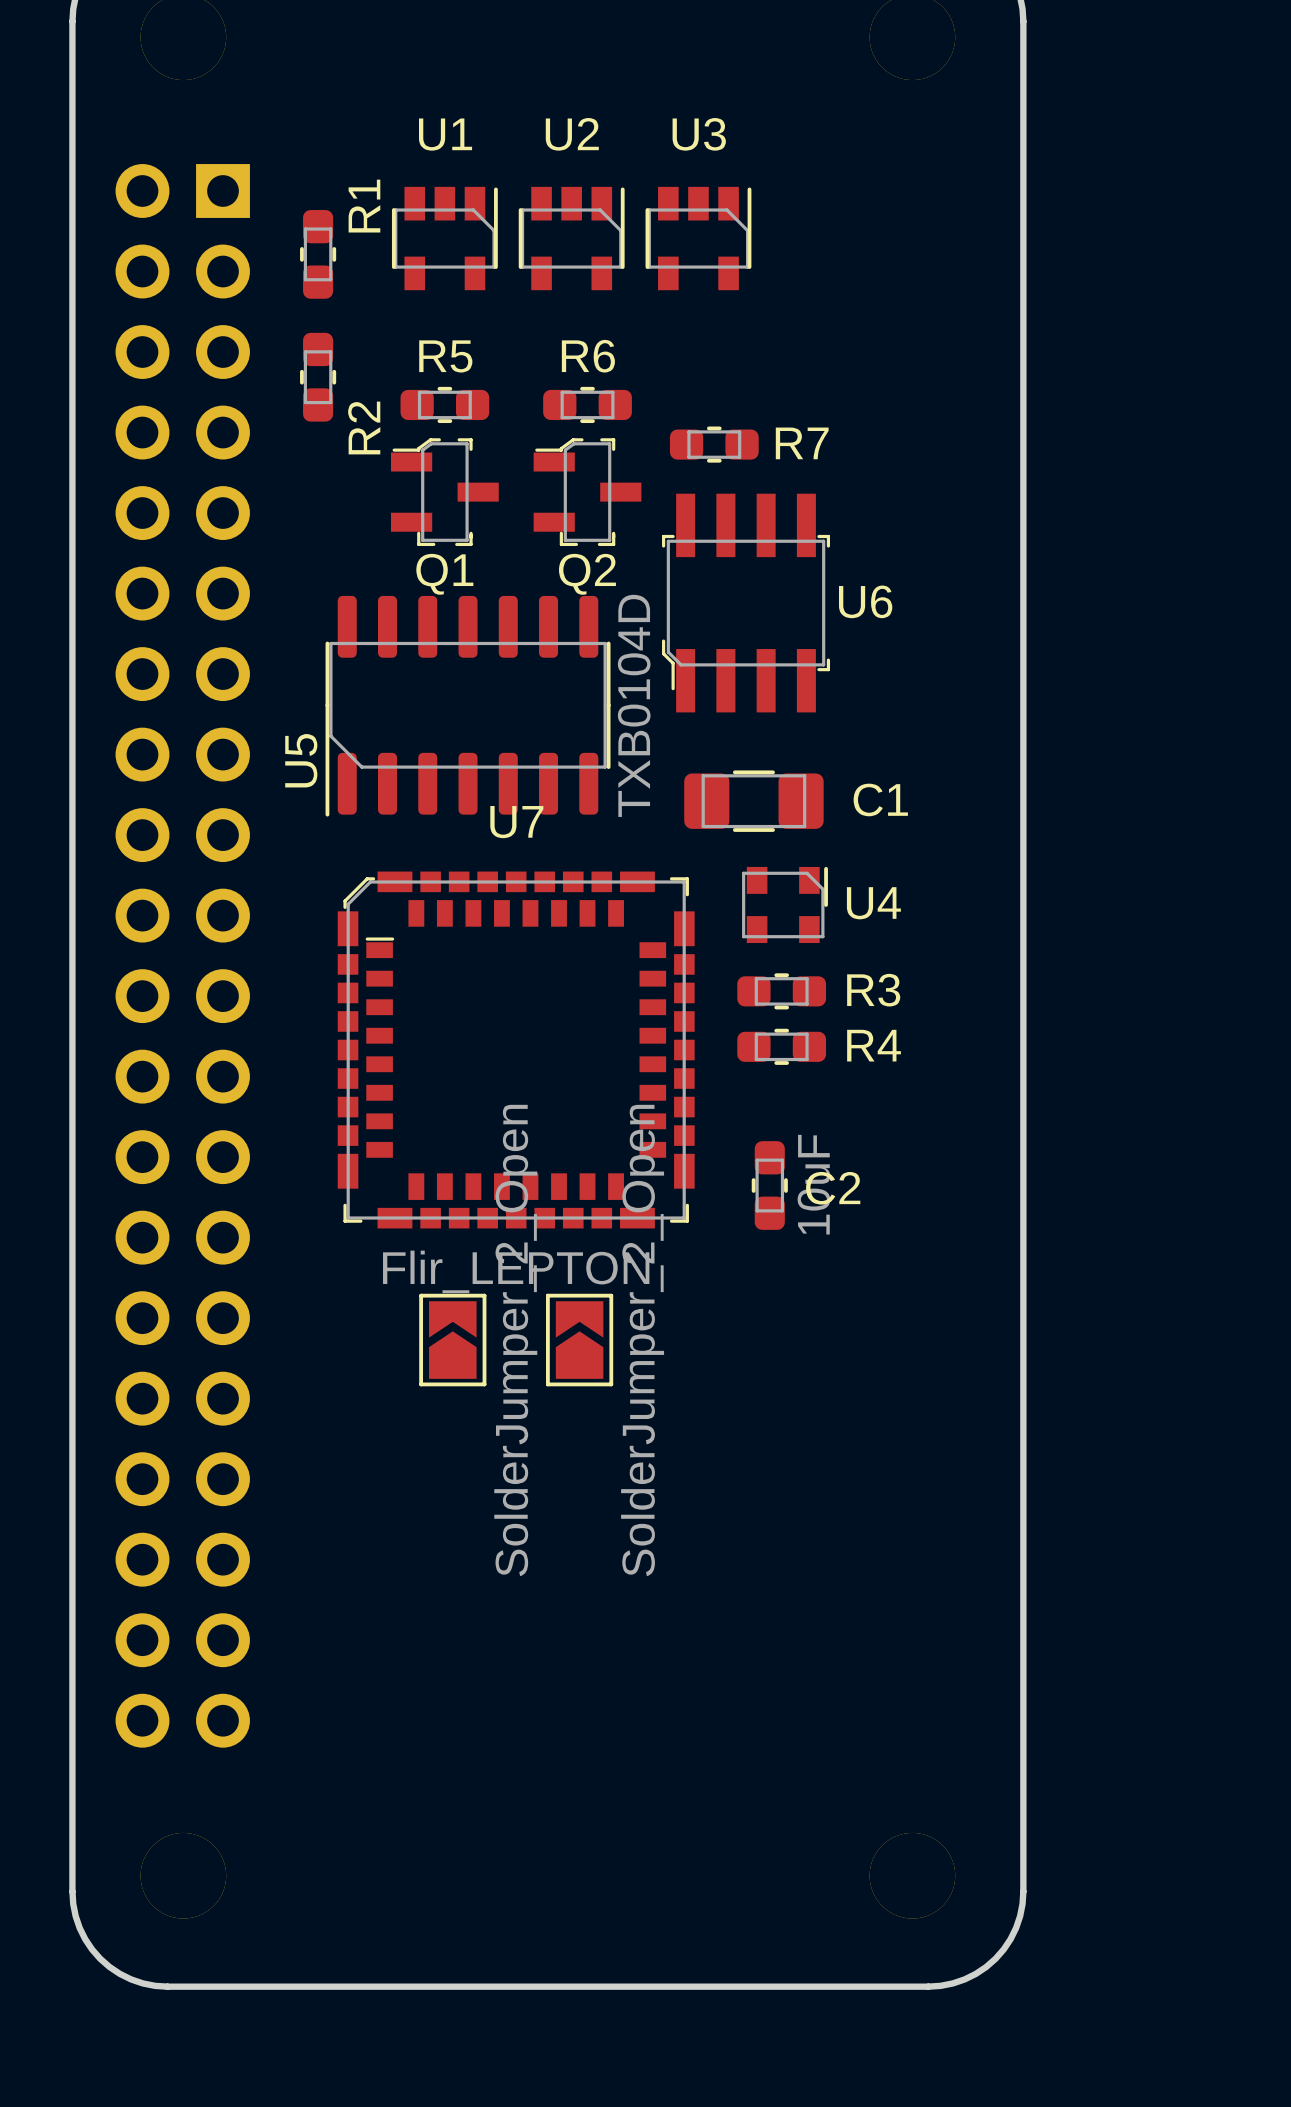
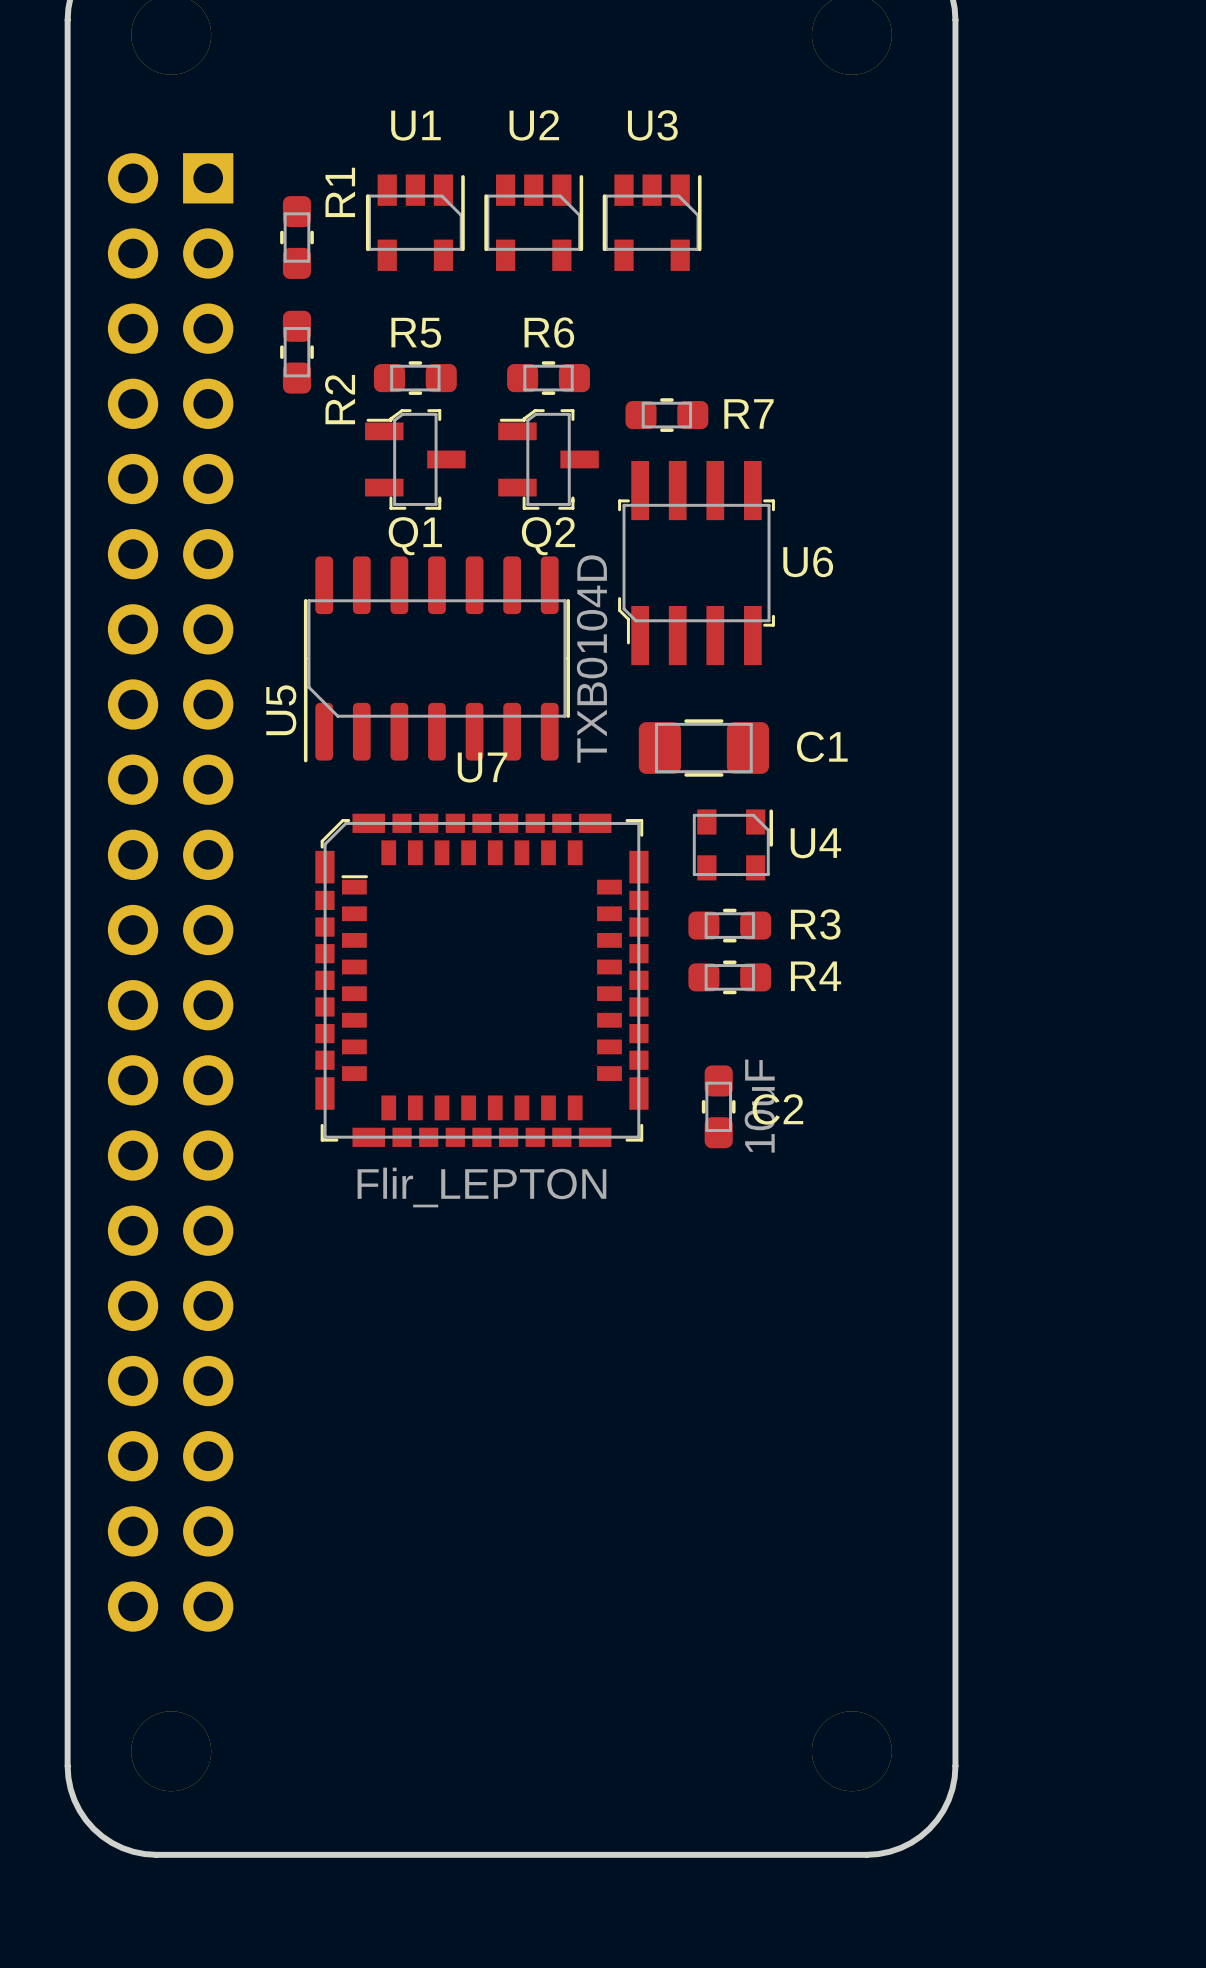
part: SolderJumper_2_Open (452, 1340) -> none
part: SolderJumper_2_Open (579, 1340) -> none

